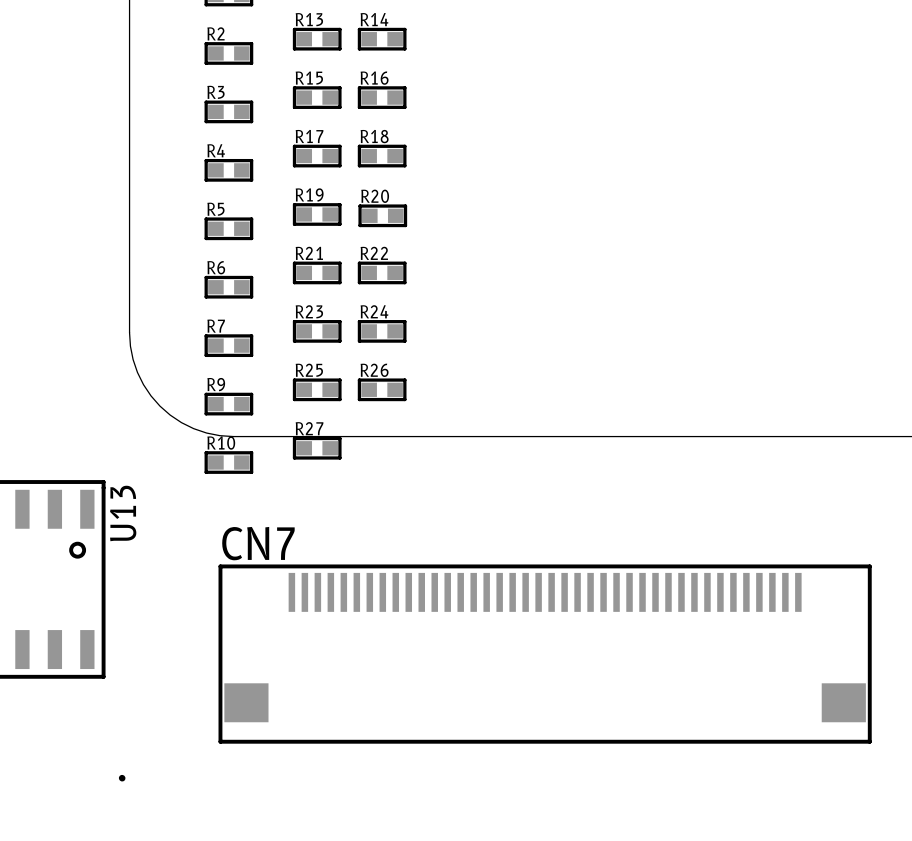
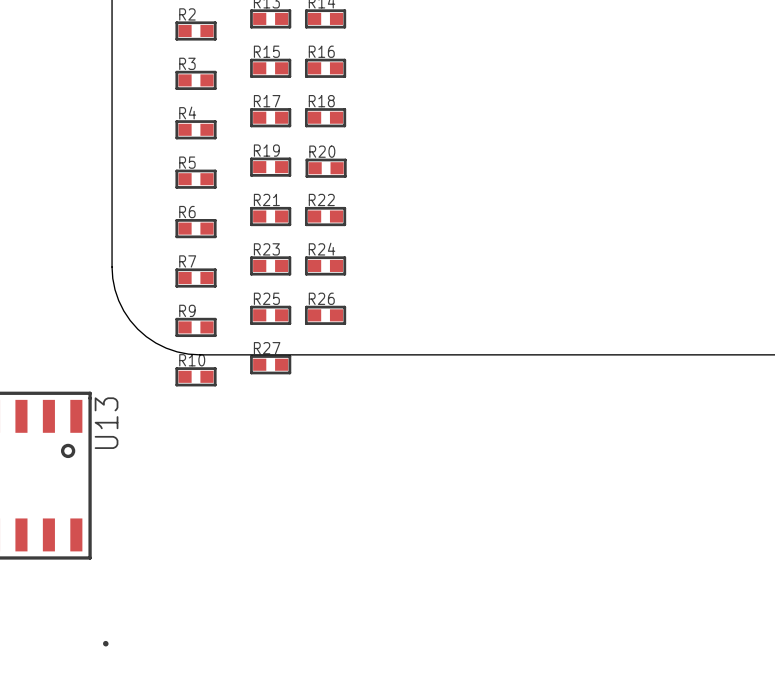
CN7: (545, 654) -> none

